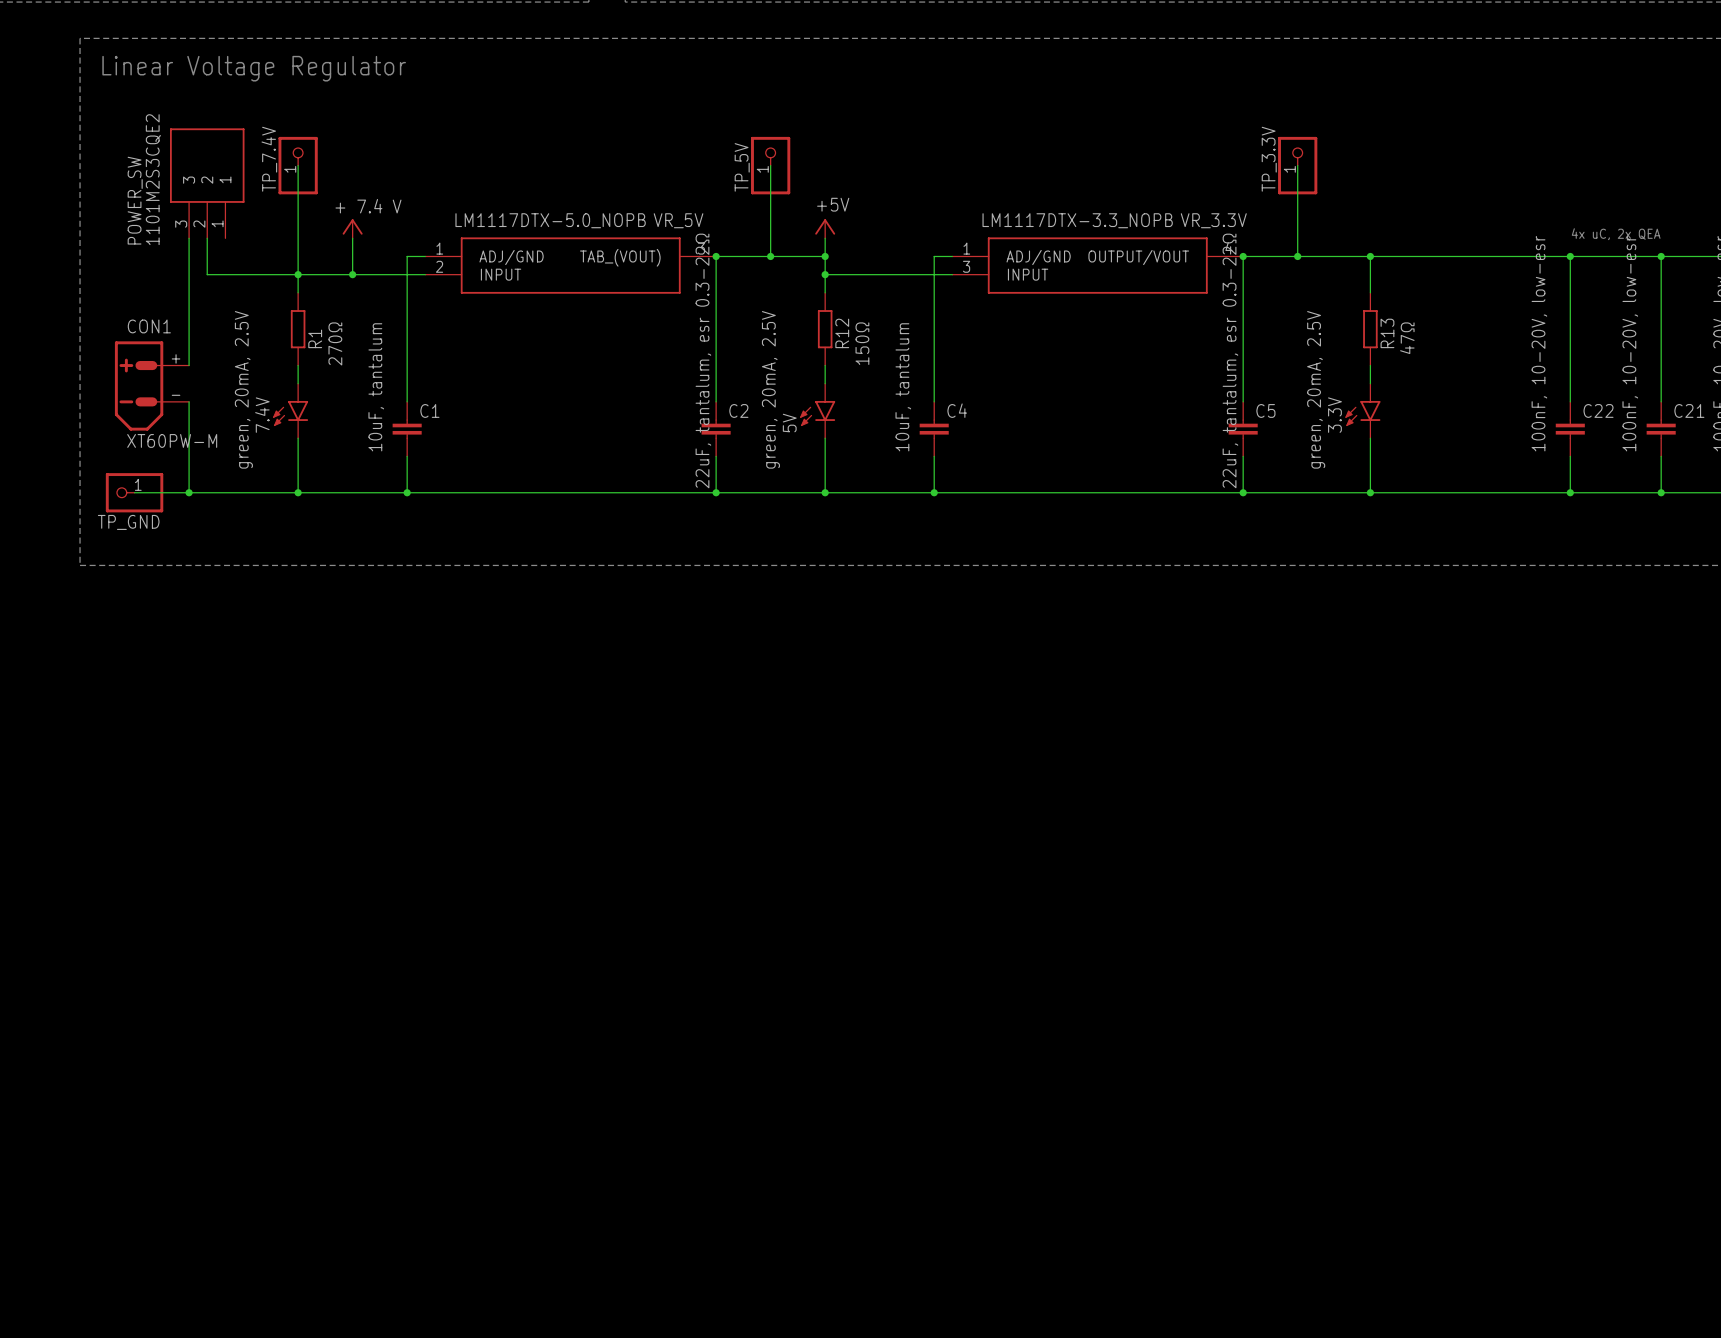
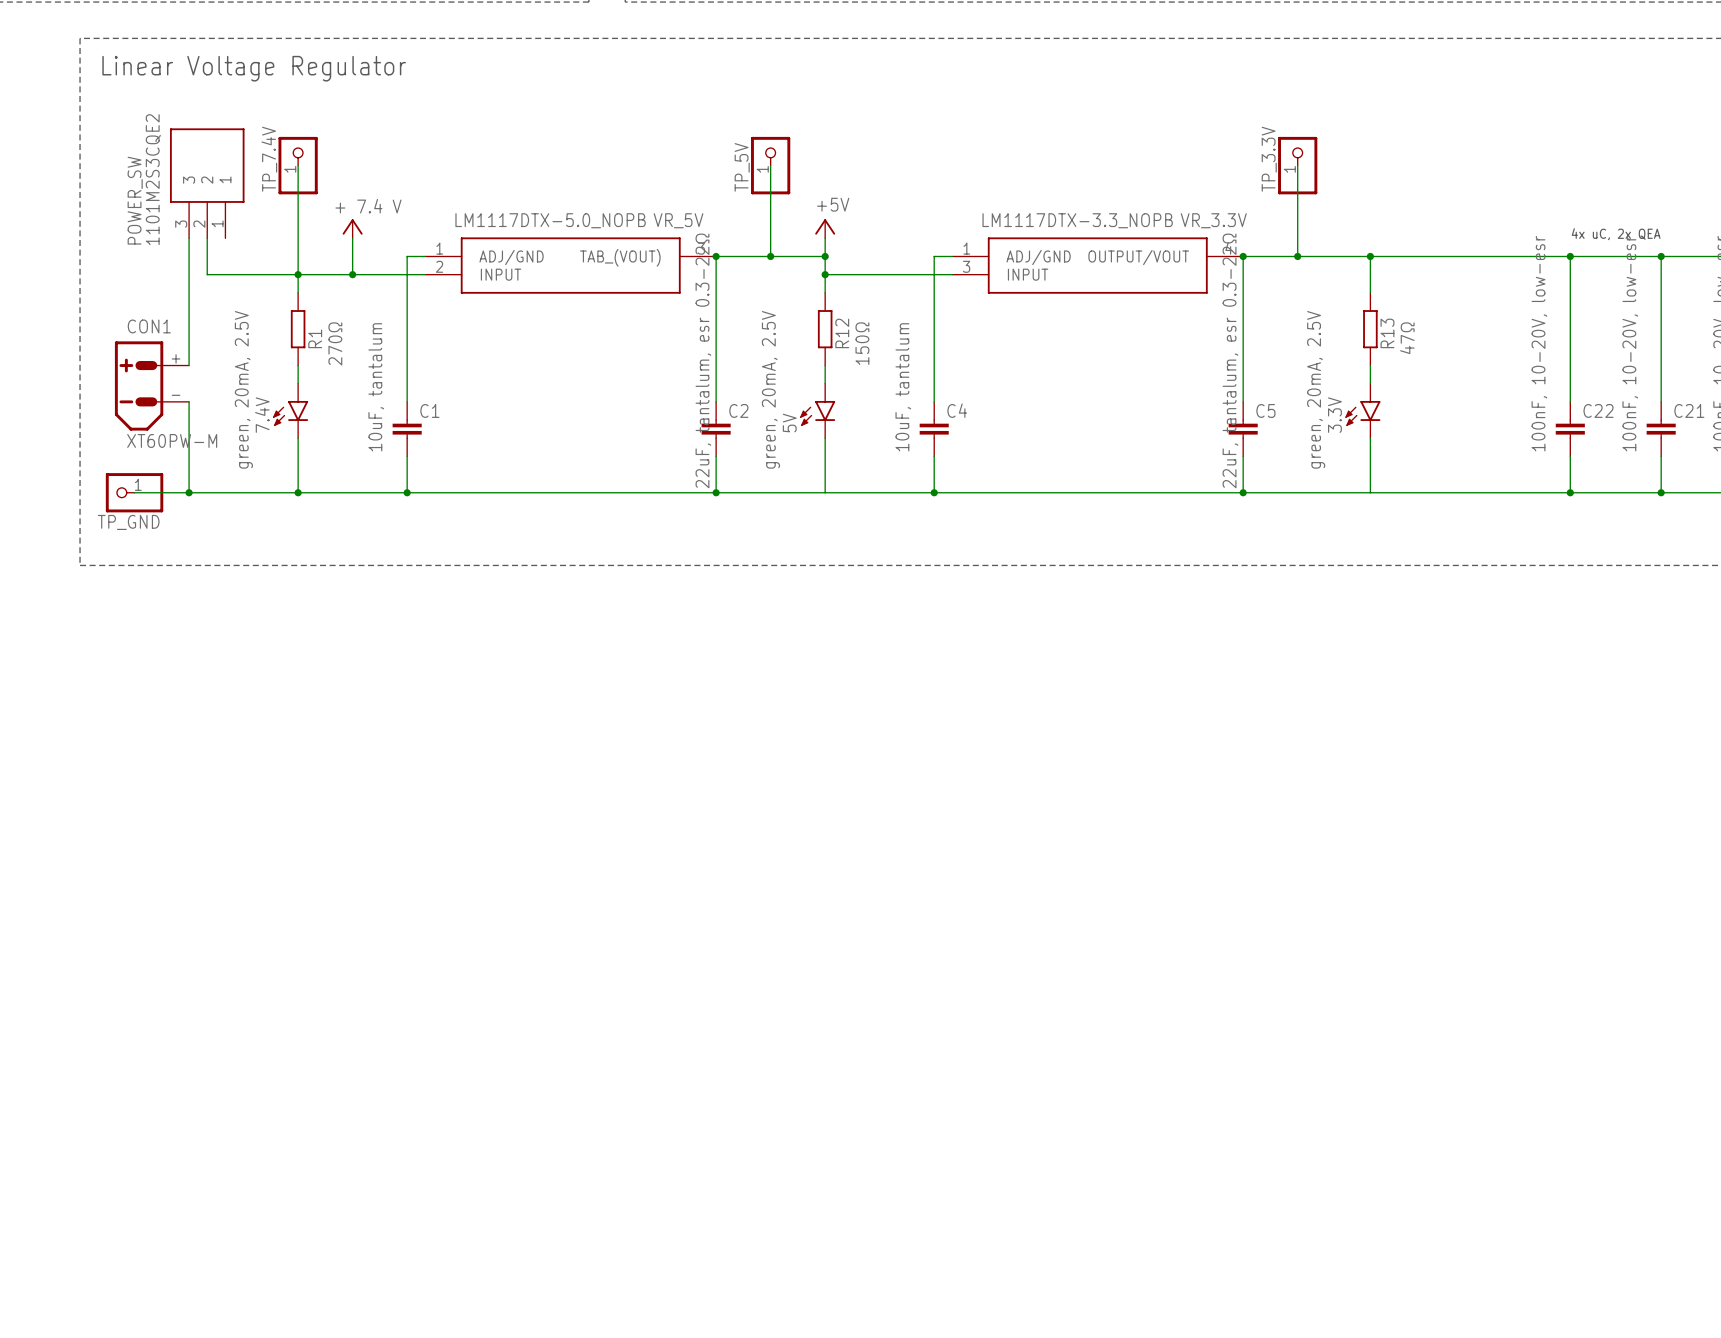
junction: (825, 492) -> none
junction: (1370, 492) -> none

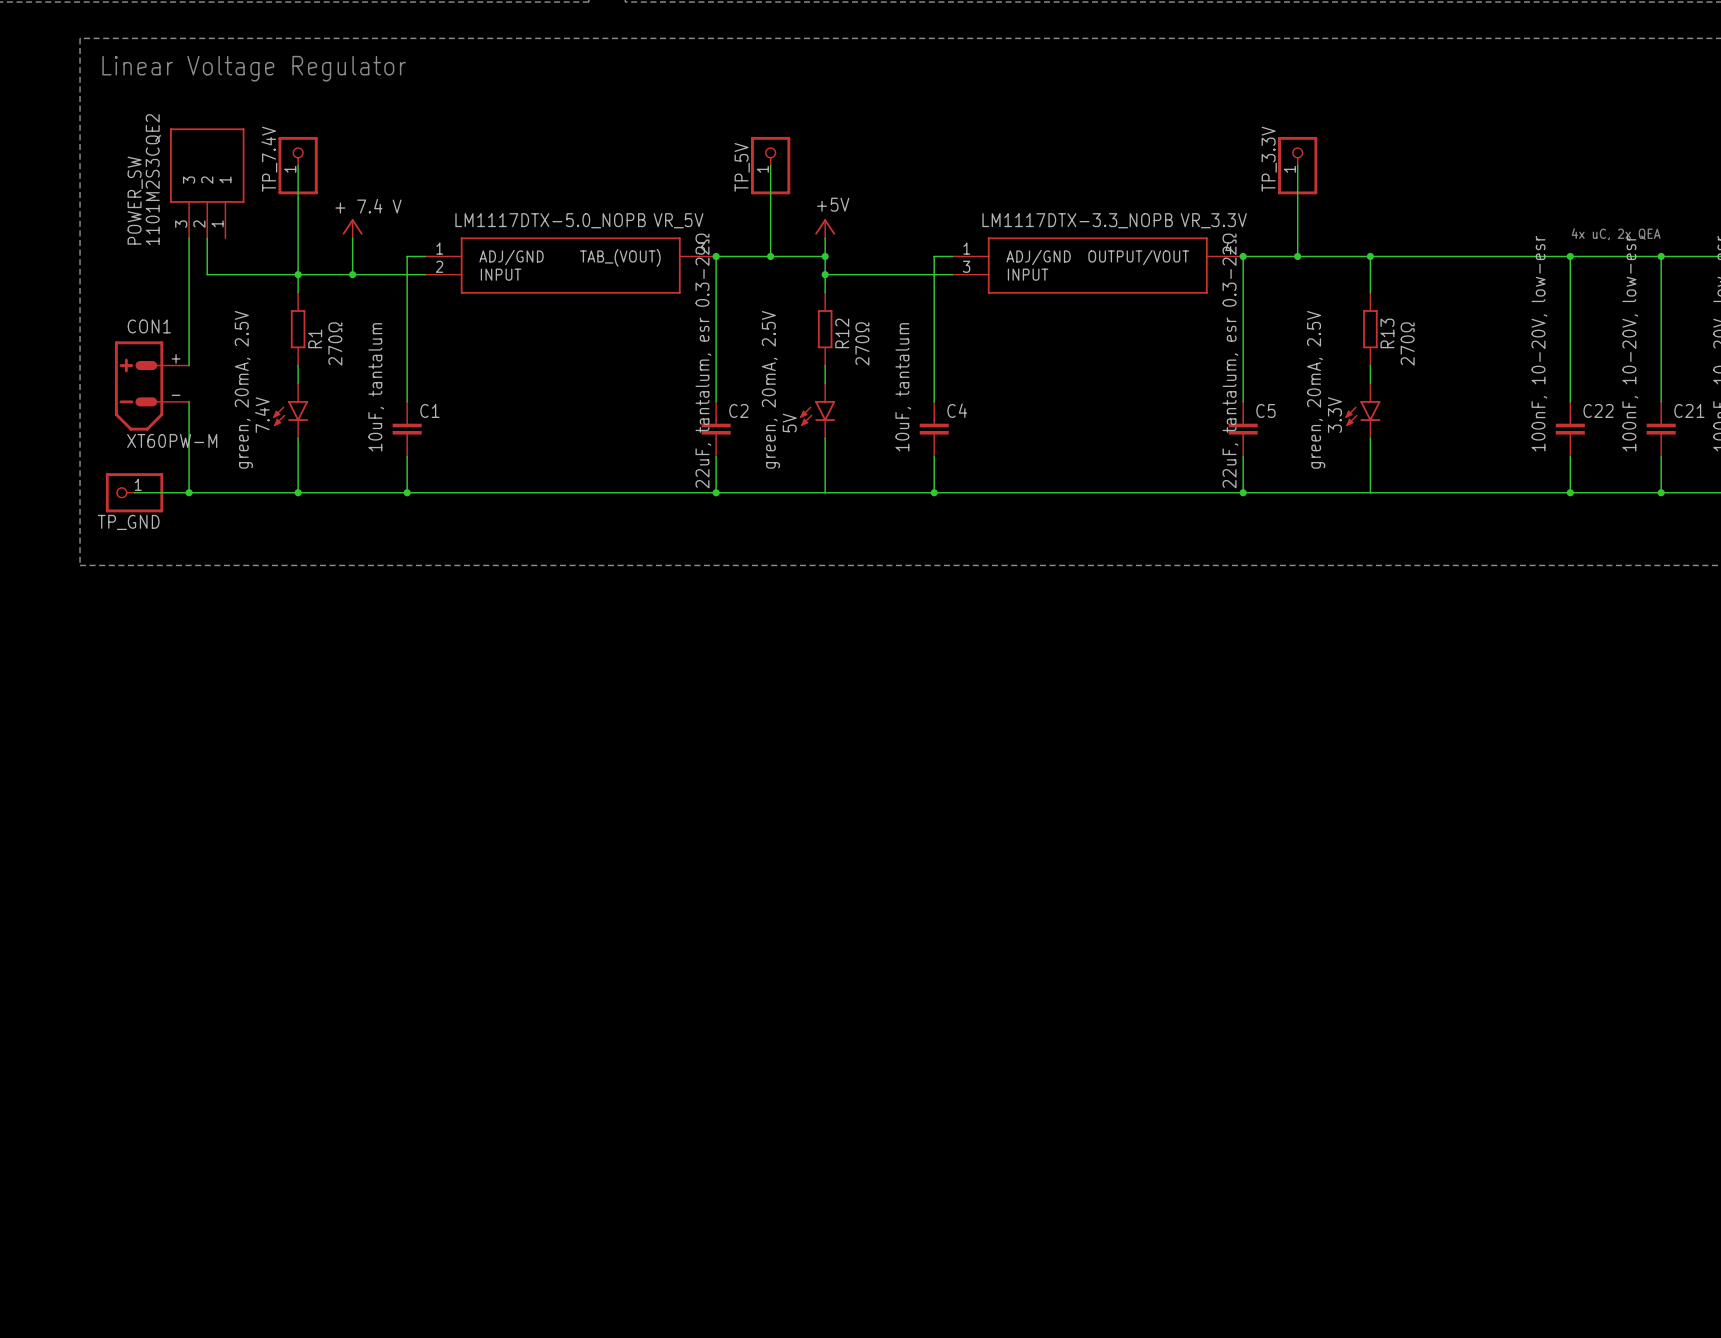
R13 value: 47Ω (1407, 338) -> 270Ω (1407, 343)
R12 value: 150Ω (862, 343) -> 270Ω (862, 343)

